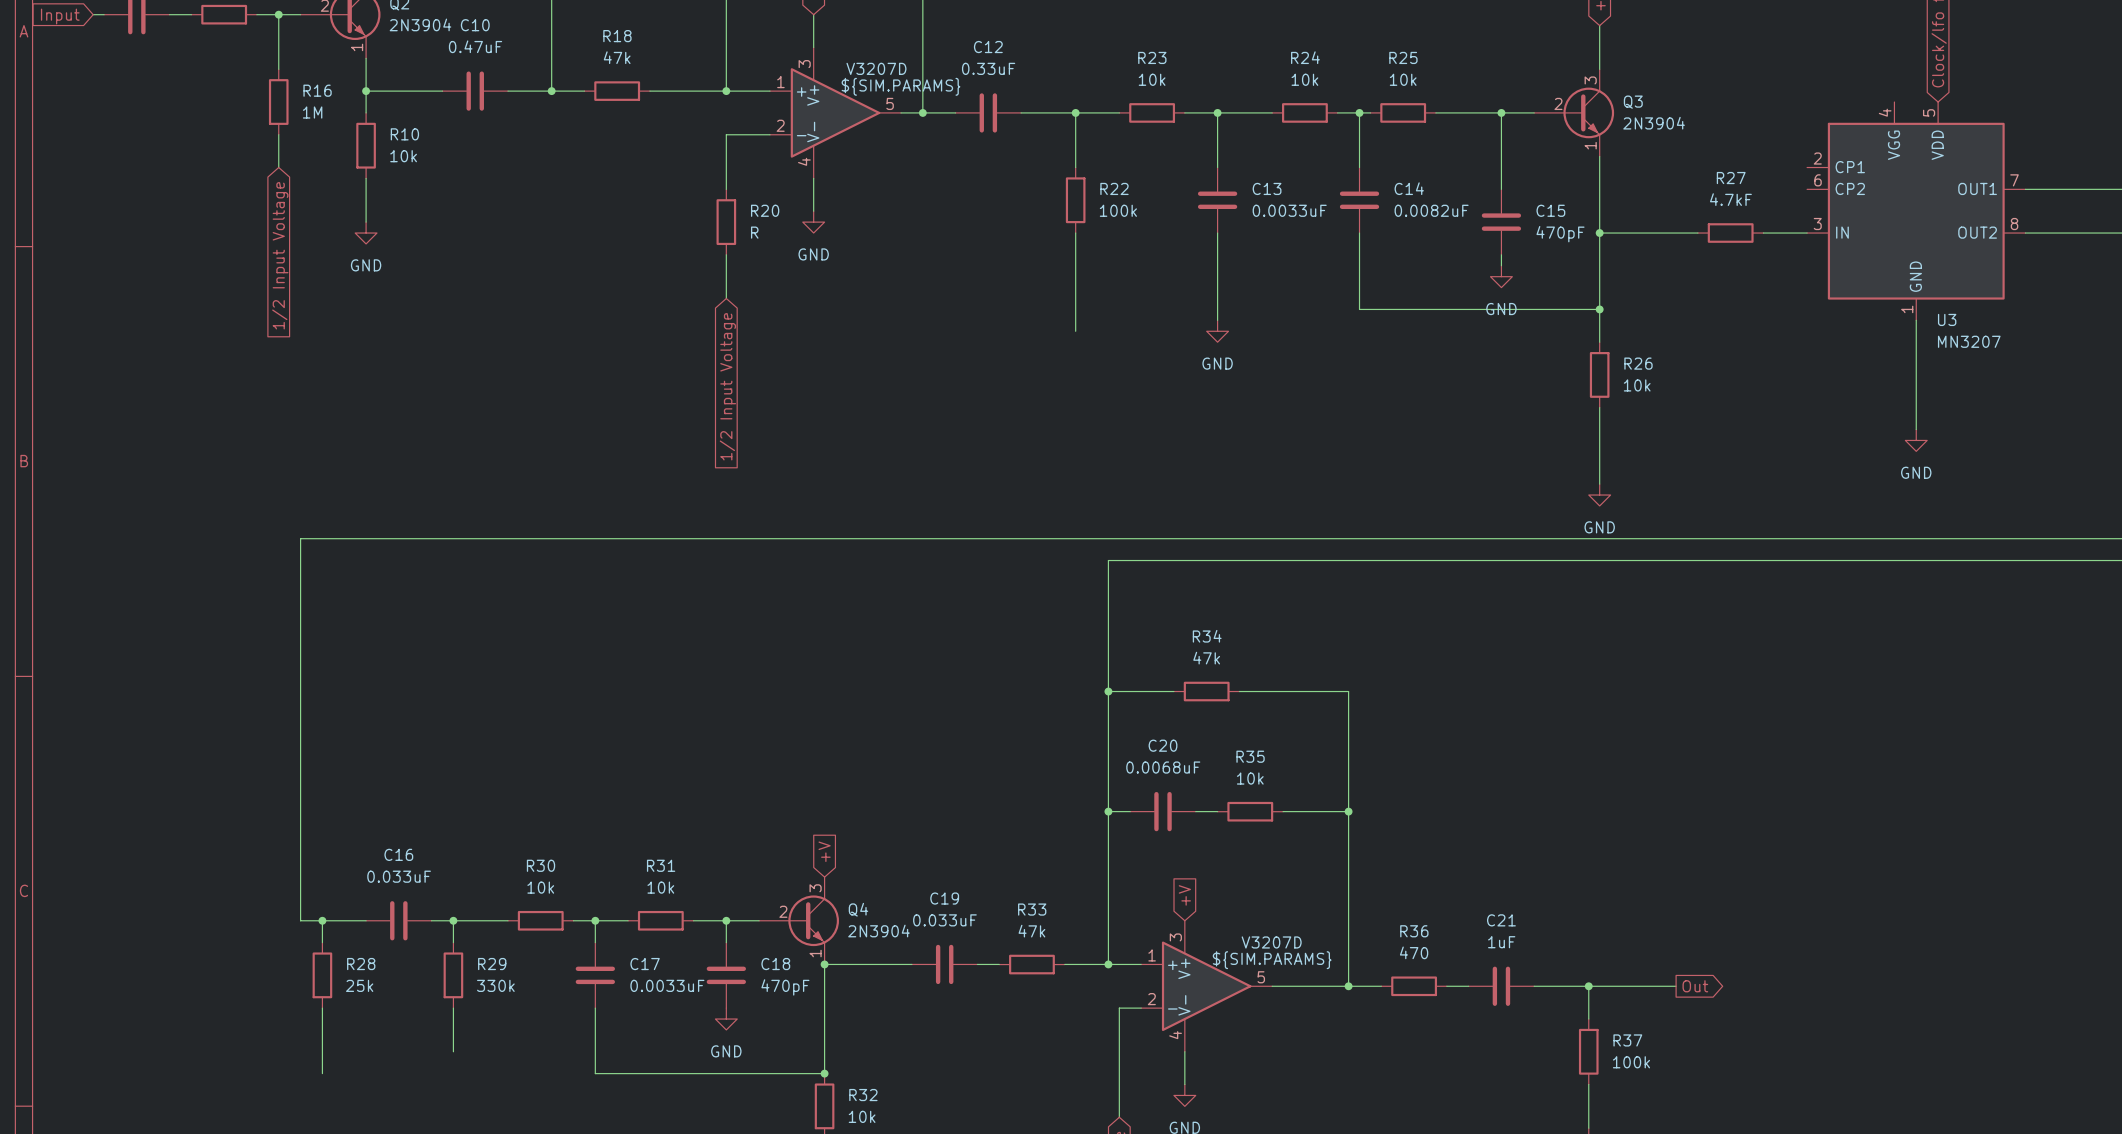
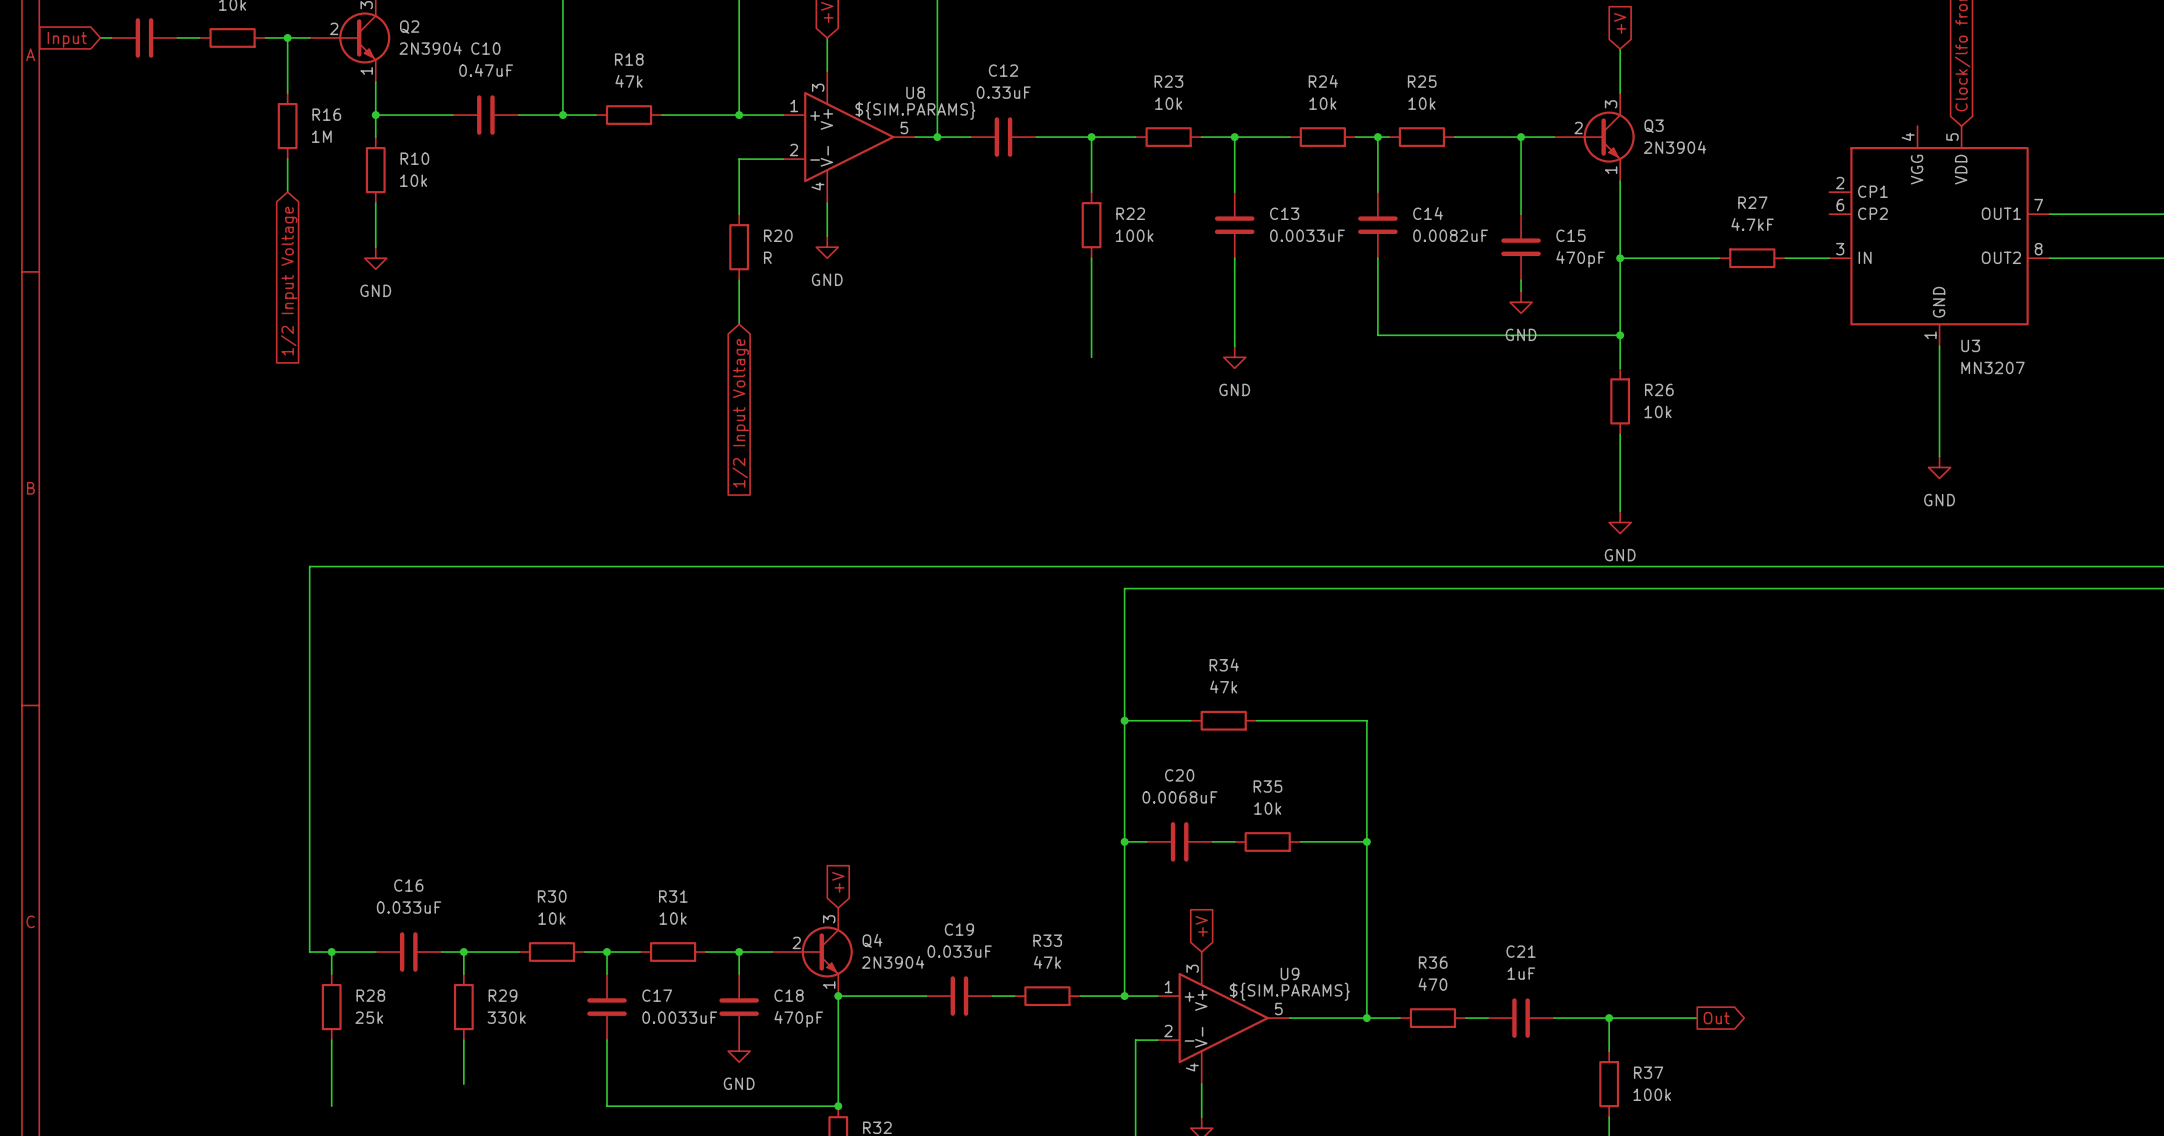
V3207D name: V3207D (876, 68) -> U8 (915, 92)
V3207D name: V3207D (1271, 942) -> U9 (1290, 973)

